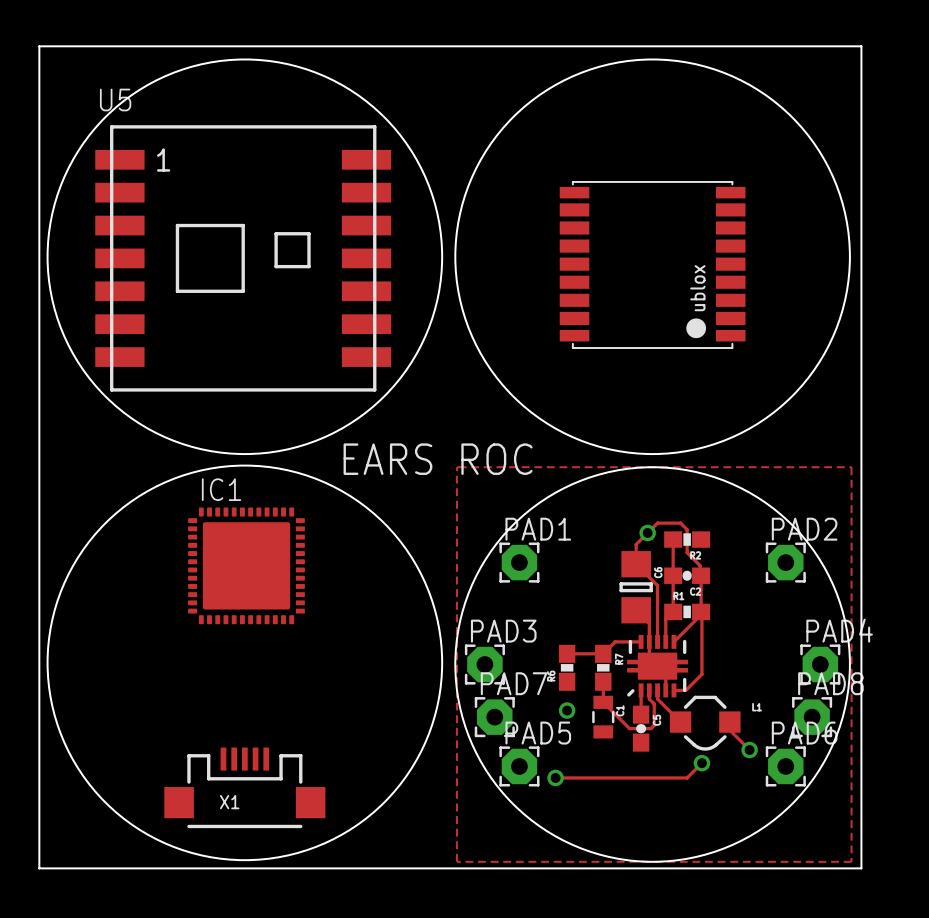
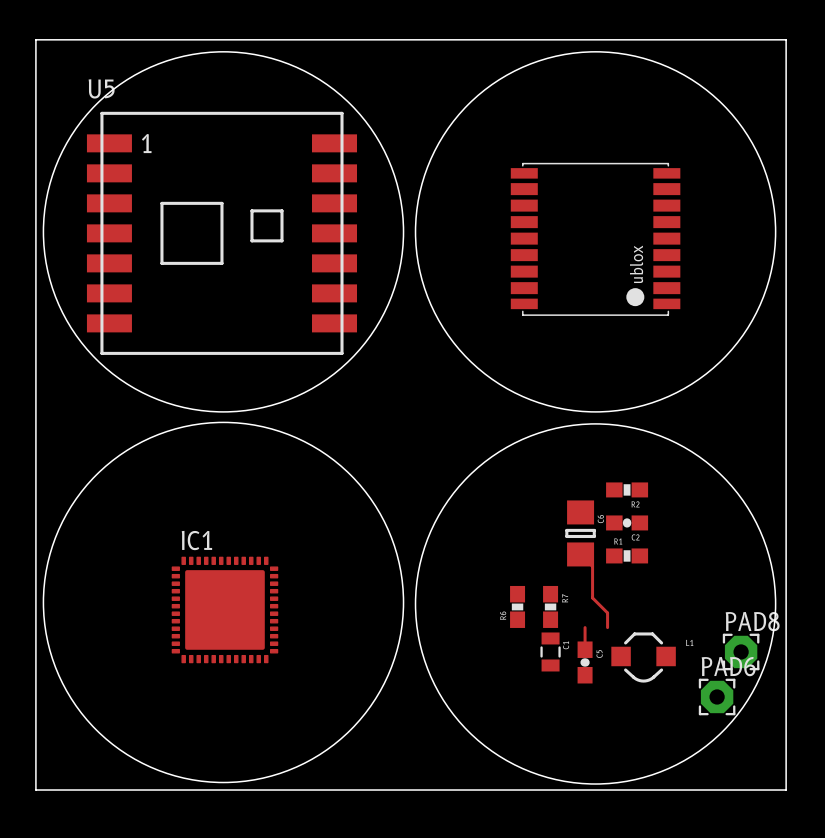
text: EARS ROC (438, 459) -> none
zone outline: (456, 467) (851, 467) (851, 861) (456, 861) (456, 467) -> none
via: (647, 532) -> none
track: (673, 539) (673, 611) (665, 619) (665, 641) -> none
PAD1: (519, 562) -> none
PAD2: (785, 562) -> none
IC1 position: (246, 565) -> (224, 609)
track: (701, 611) (701, 674) (685, 690) (673, 690) -> none
track: (641, 641) (615, 641) (603, 653) (567, 653) -> none
track: (657, 641) (657, 585) (636, 564) (636, 544) (657, 523) (680, 523) (687, 529) (687, 552) (700, 565) (701, 614) (673, 641) -> none
PAD3: (484, 664) -> none
PAD4: (820, 664) -> none
part: (657, 666) -> none
track: (603, 681) (603, 702) (629, 728) (650, 728) (654, 725) (654, 703) (649, 699) (649, 690) -> none
track: (657, 690) (657, 699) (680, 722) -> none
via: (567, 710) -> none
PAD7: (494, 717) -> none
track: (729, 722) (729, 730) (749, 750) -> none
via: (749, 750) -> none
track: (701, 763) (687, 777) (555, 777) -> none
via: (701, 763) -> none
PAD5: (519, 766) -> none
via: (555, 777) -> none
X1: (244, 787) -> none

